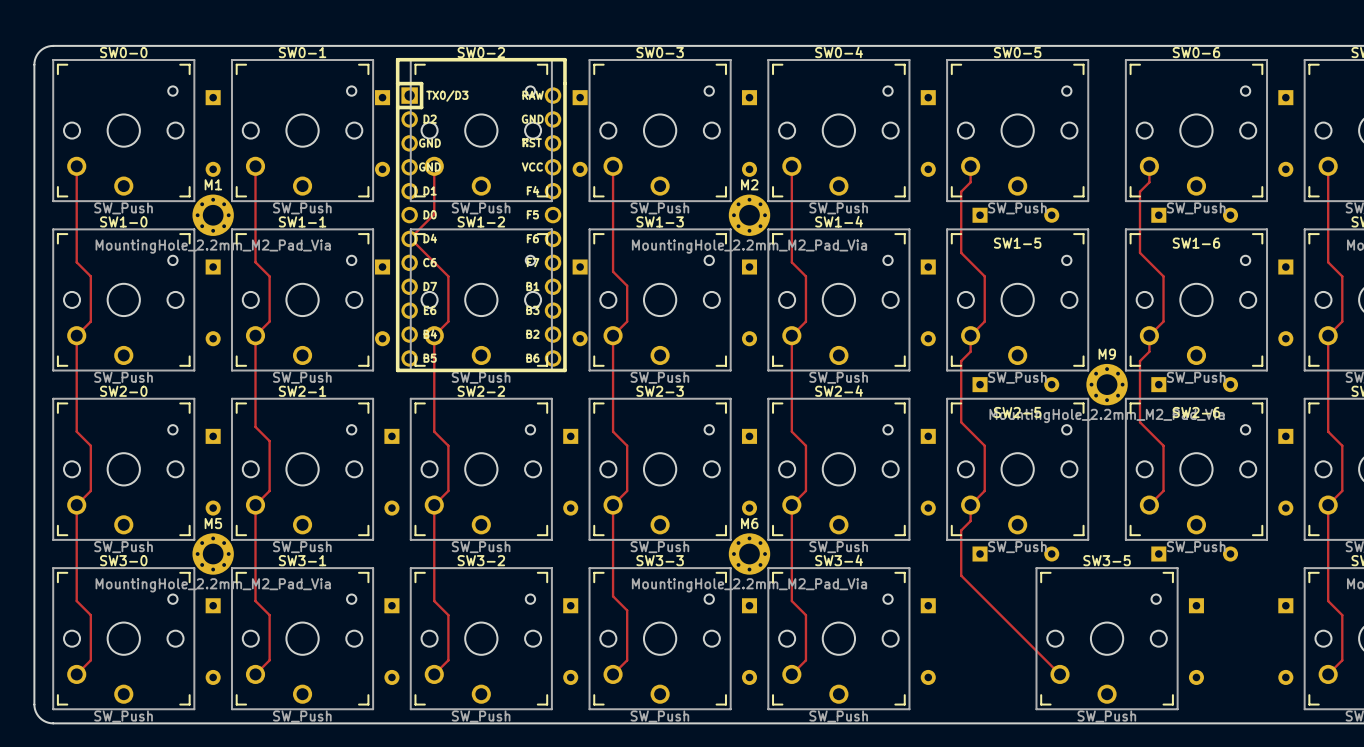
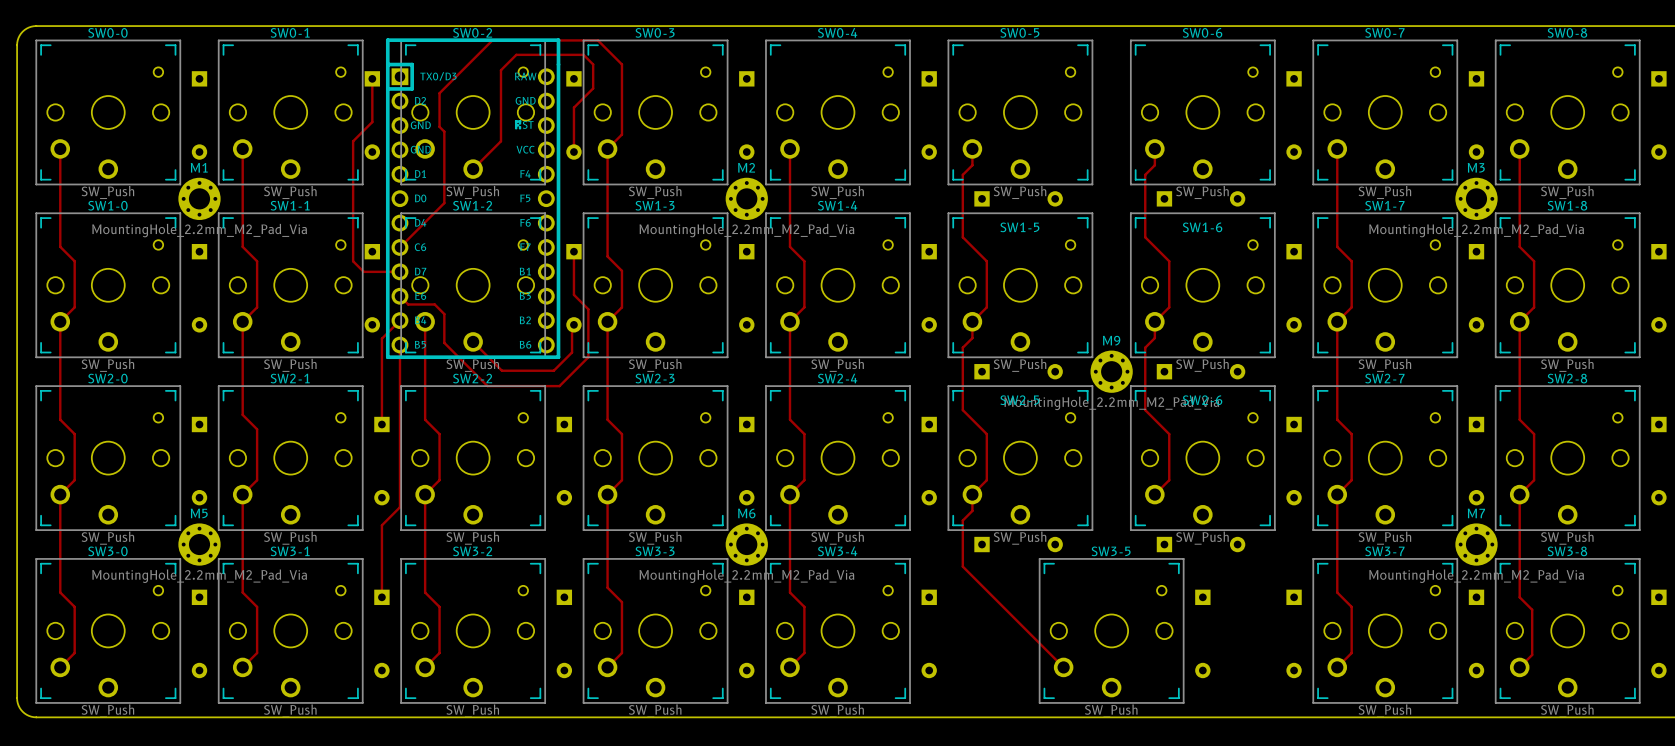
track: none -> (372, 78) (372, 122) (353, 141) (353, 261) (363, 271) (399, 271)
track: (434, 166) (434, 214) (409, 238) -> none
track: none -> (607, 148) (621, 134) (621, 64) (597, 40) (492, 40) (439, 93) (439, 126) (444, 131) (444, 203) (399, 247)
track: none -> (573, 152) (573, 107) (593, 88) (593, 64) (583, 54) (516, 54) (500, 70) (500, 141) (473, 169)
track: (410, 238) (448, 276) (448, 321) (434, 335) -> none
track: none -> (573, 251) (573, 294) (588, 309) (588, 357) (559, 386) (487, 386) (444, 342) (444, 314) (434, 304) (408, 304) (399, 296)
track: none -> (399, 320) (381, 338) (381, 424)
track: none -> (573, 324) (572, 326) (572, 352) (553, 370) (501, 370) (473, 341)
track: none -> (399, 345) (399, 507) (381, 525) (381, 597)

